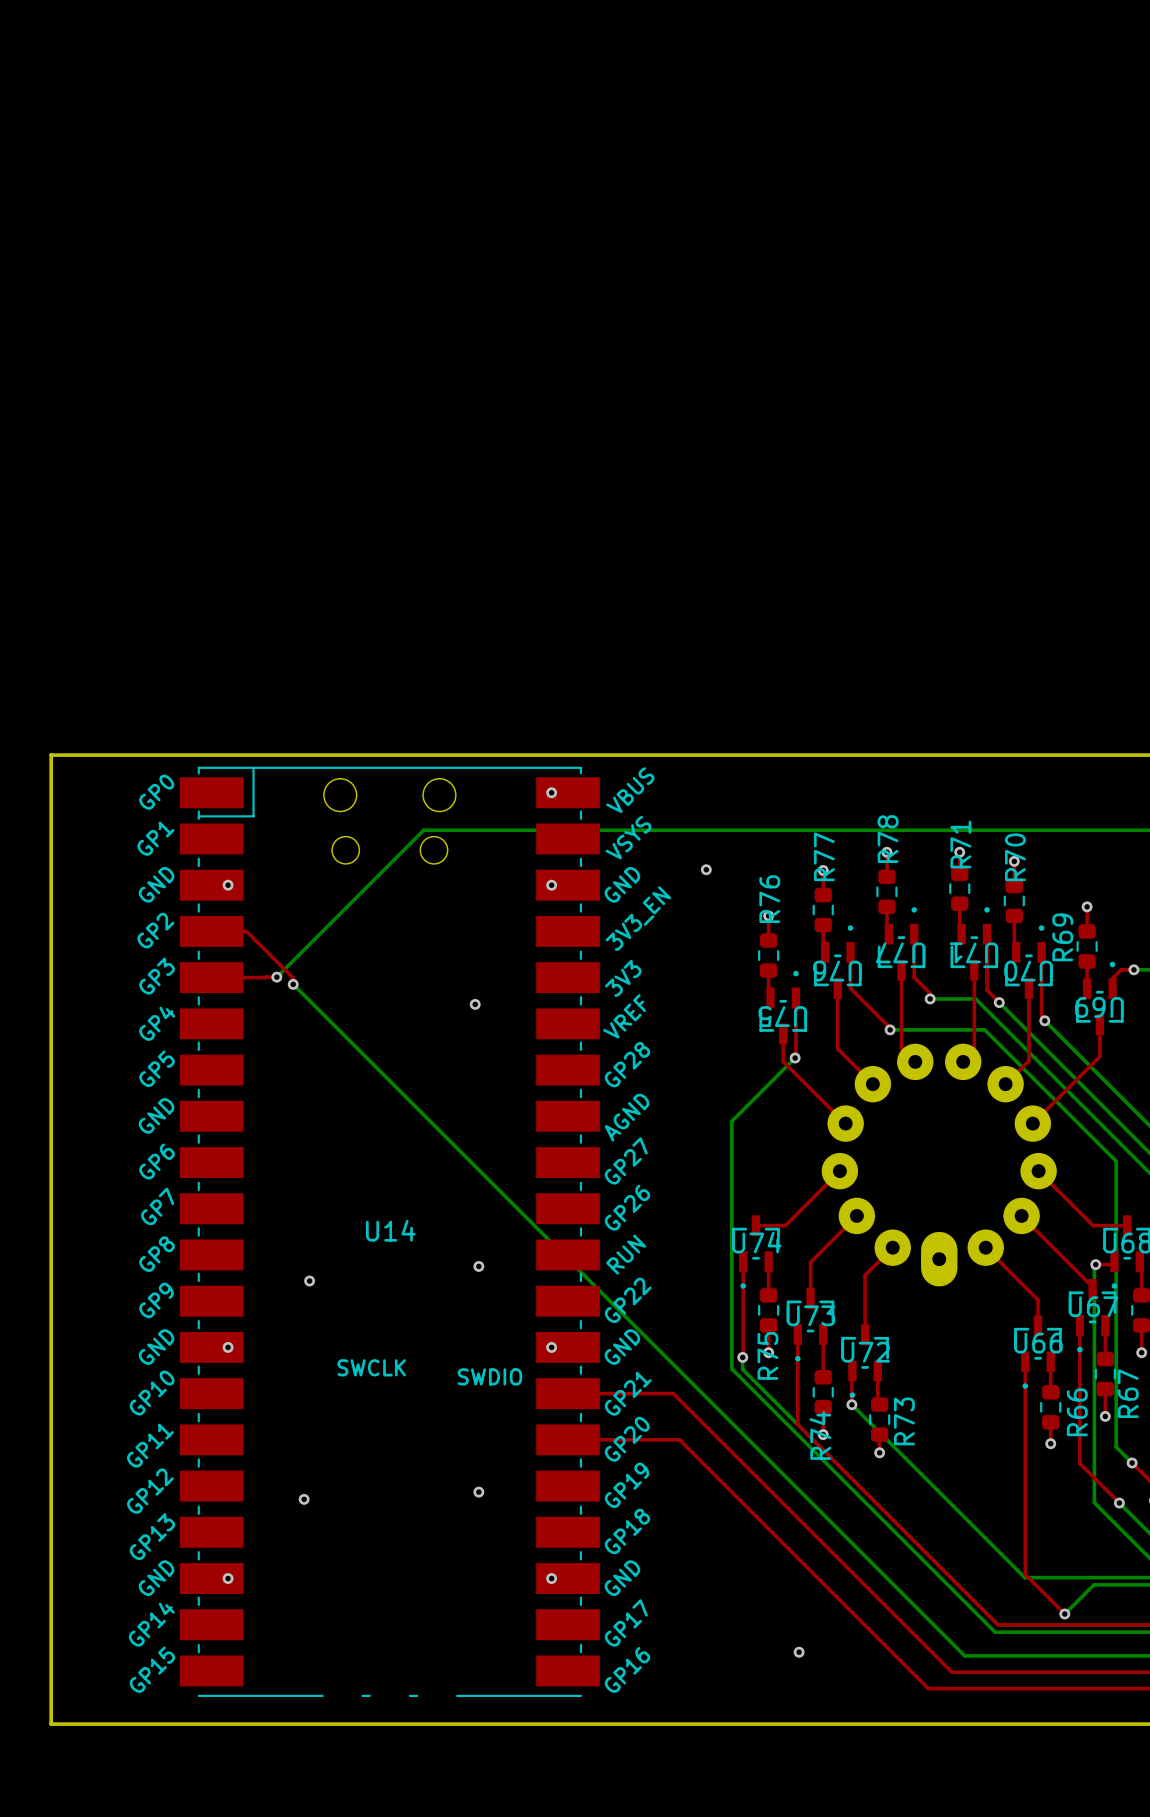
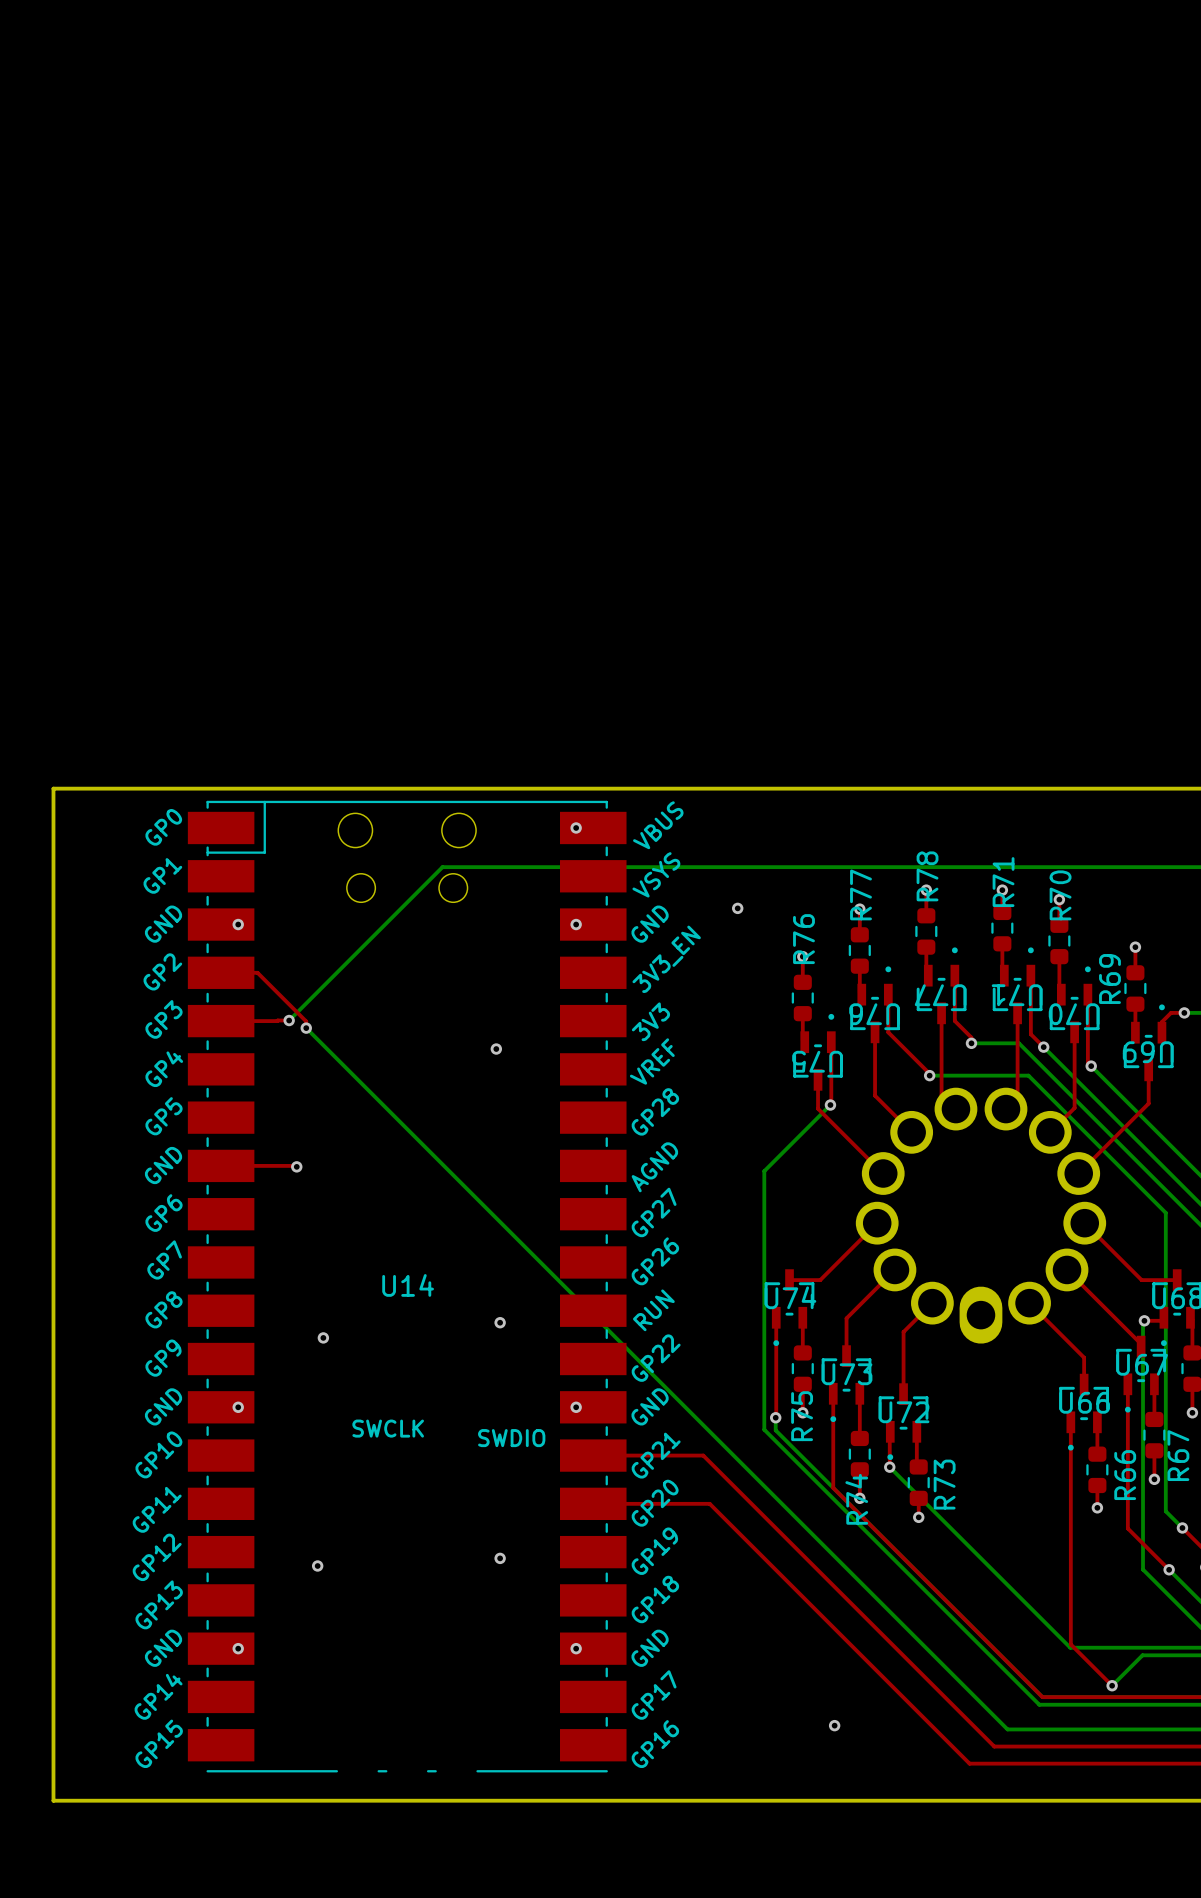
part footprint: [821, 1043, 1057, 1287] -> [855, 1087, 1107, 1344]
top track: none -> (238, 1165) (296, 1166)
via: none -> (296, 1166)

